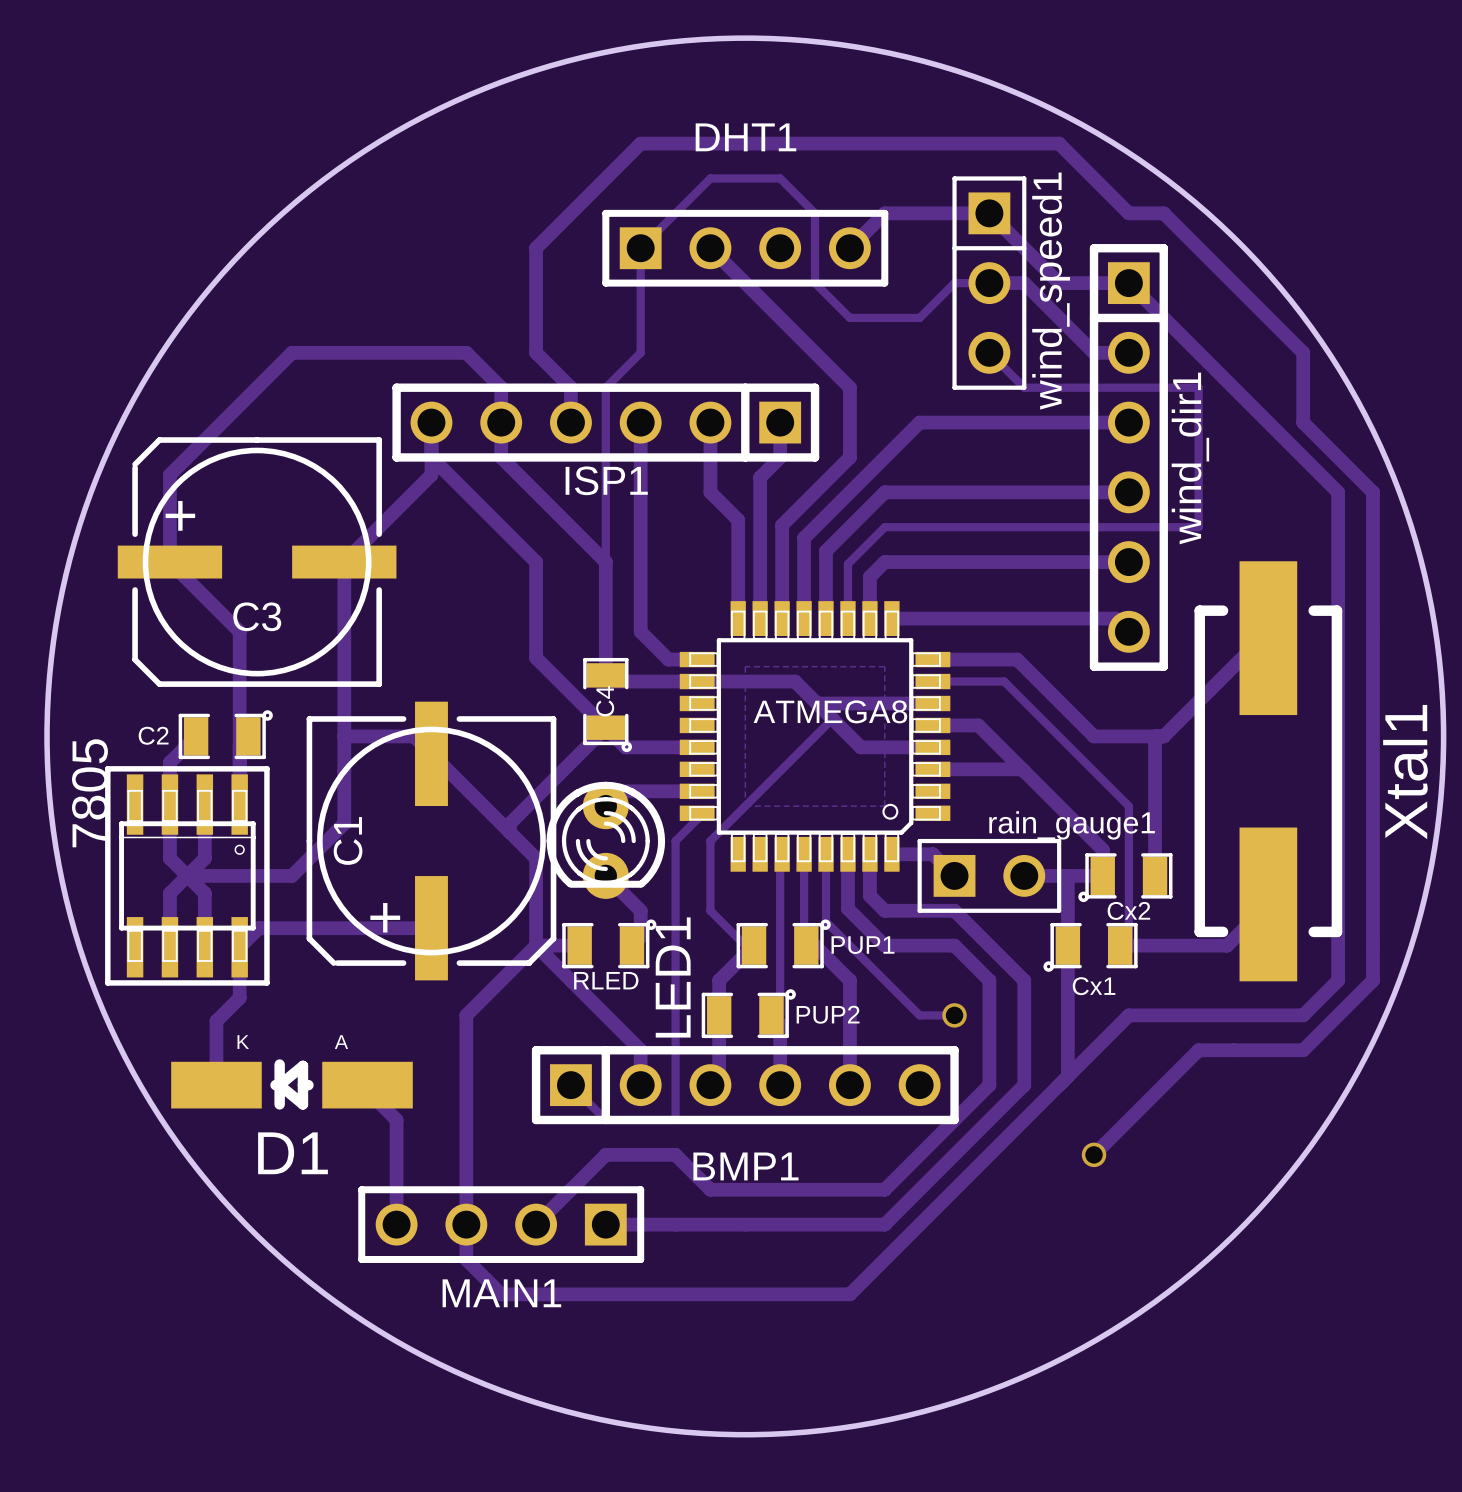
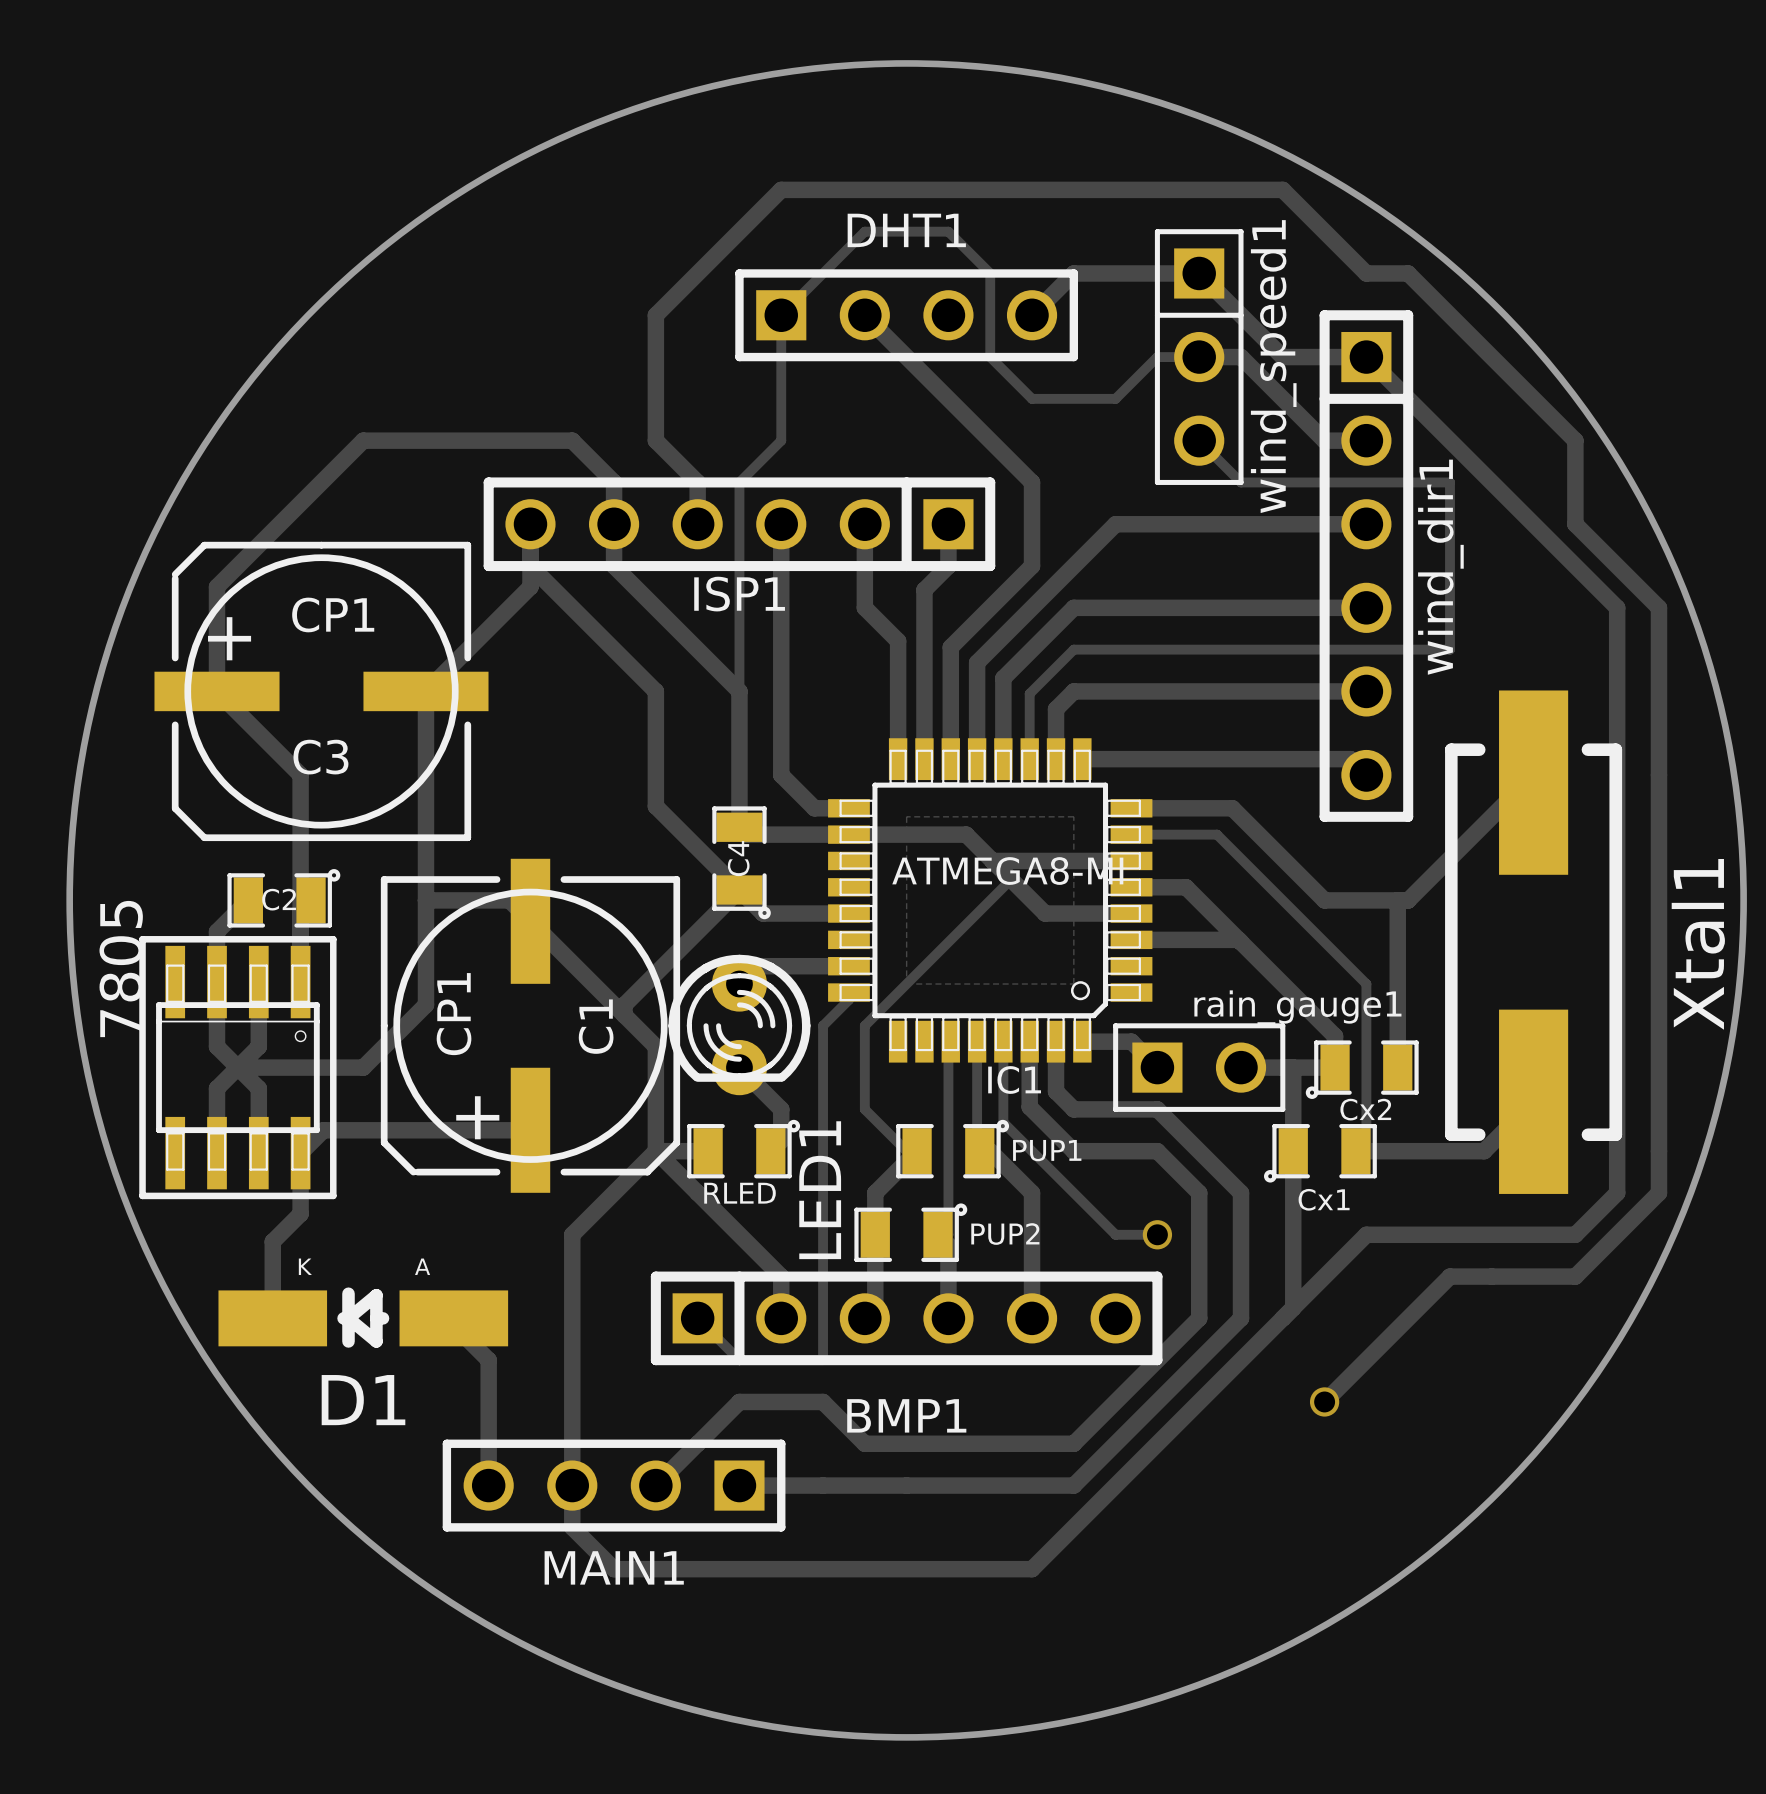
DHT1 name position: DHT1 (745, 137) -> DHT1 (906, 230)
C3 value: none -> CP1 (333, 614)
IC1 value: ATMEGA8 (830, 711) -> ATMEGA8-MI (1007, 871)
C2 name position: C2 (153, 735) -> C2 (279, 899)
C1 value: none -> CP1 (454, 1014)
C1 name position: C1 (348, 840) -> C1 (596, 1026)
IC1 name: none -> IC1 (1014, 1079)

